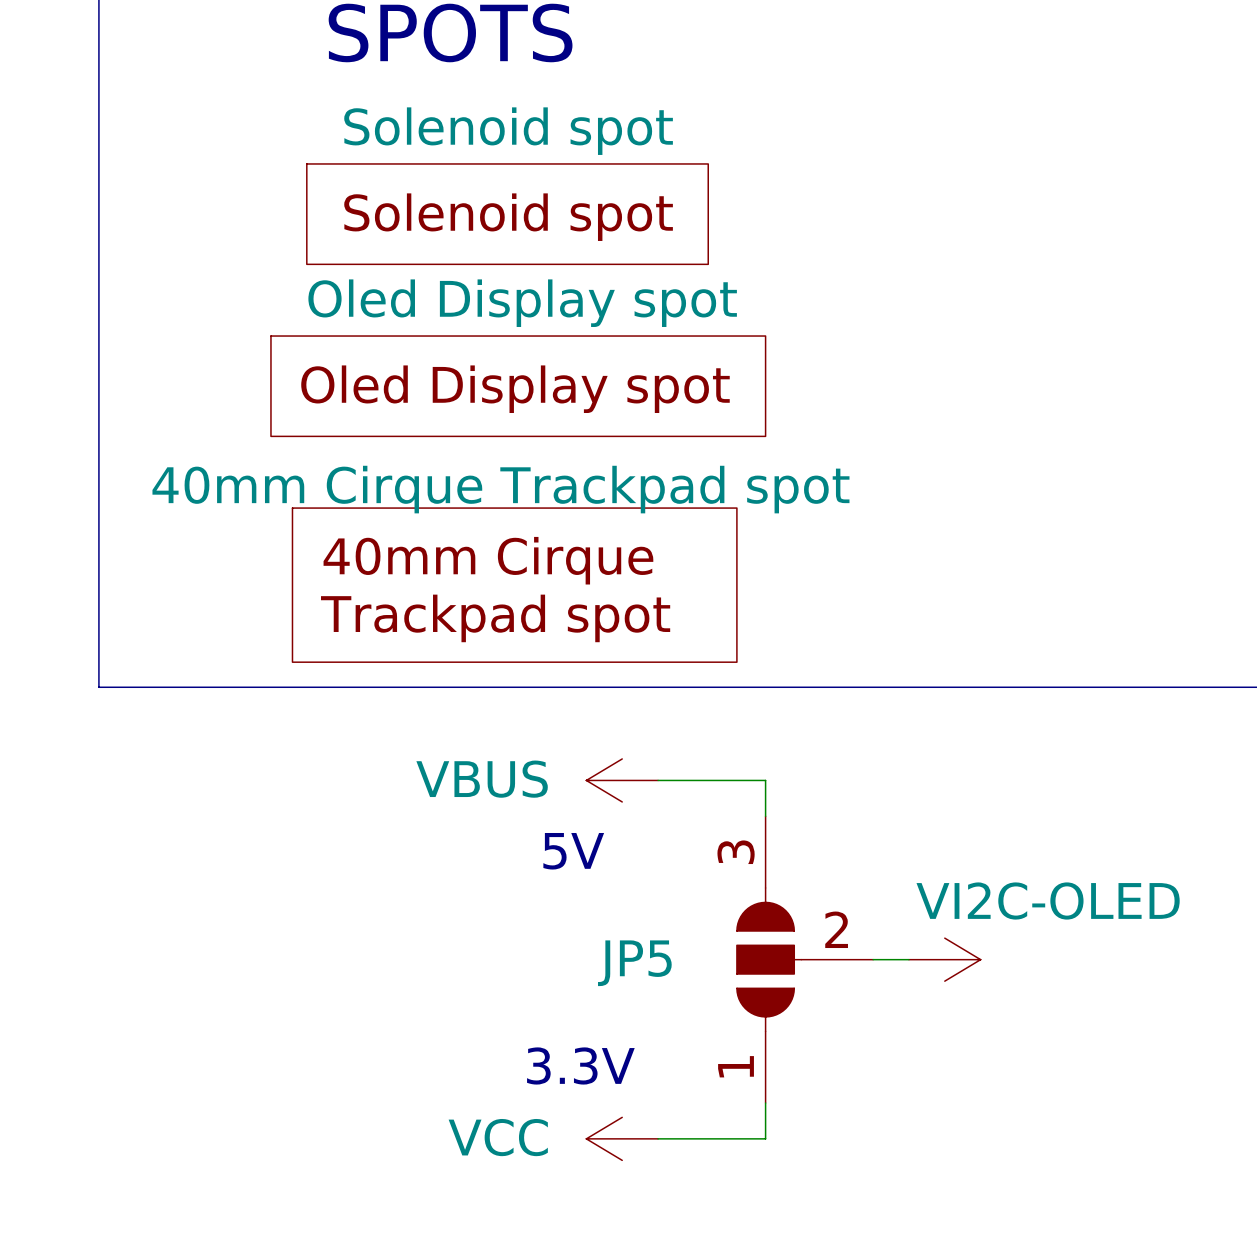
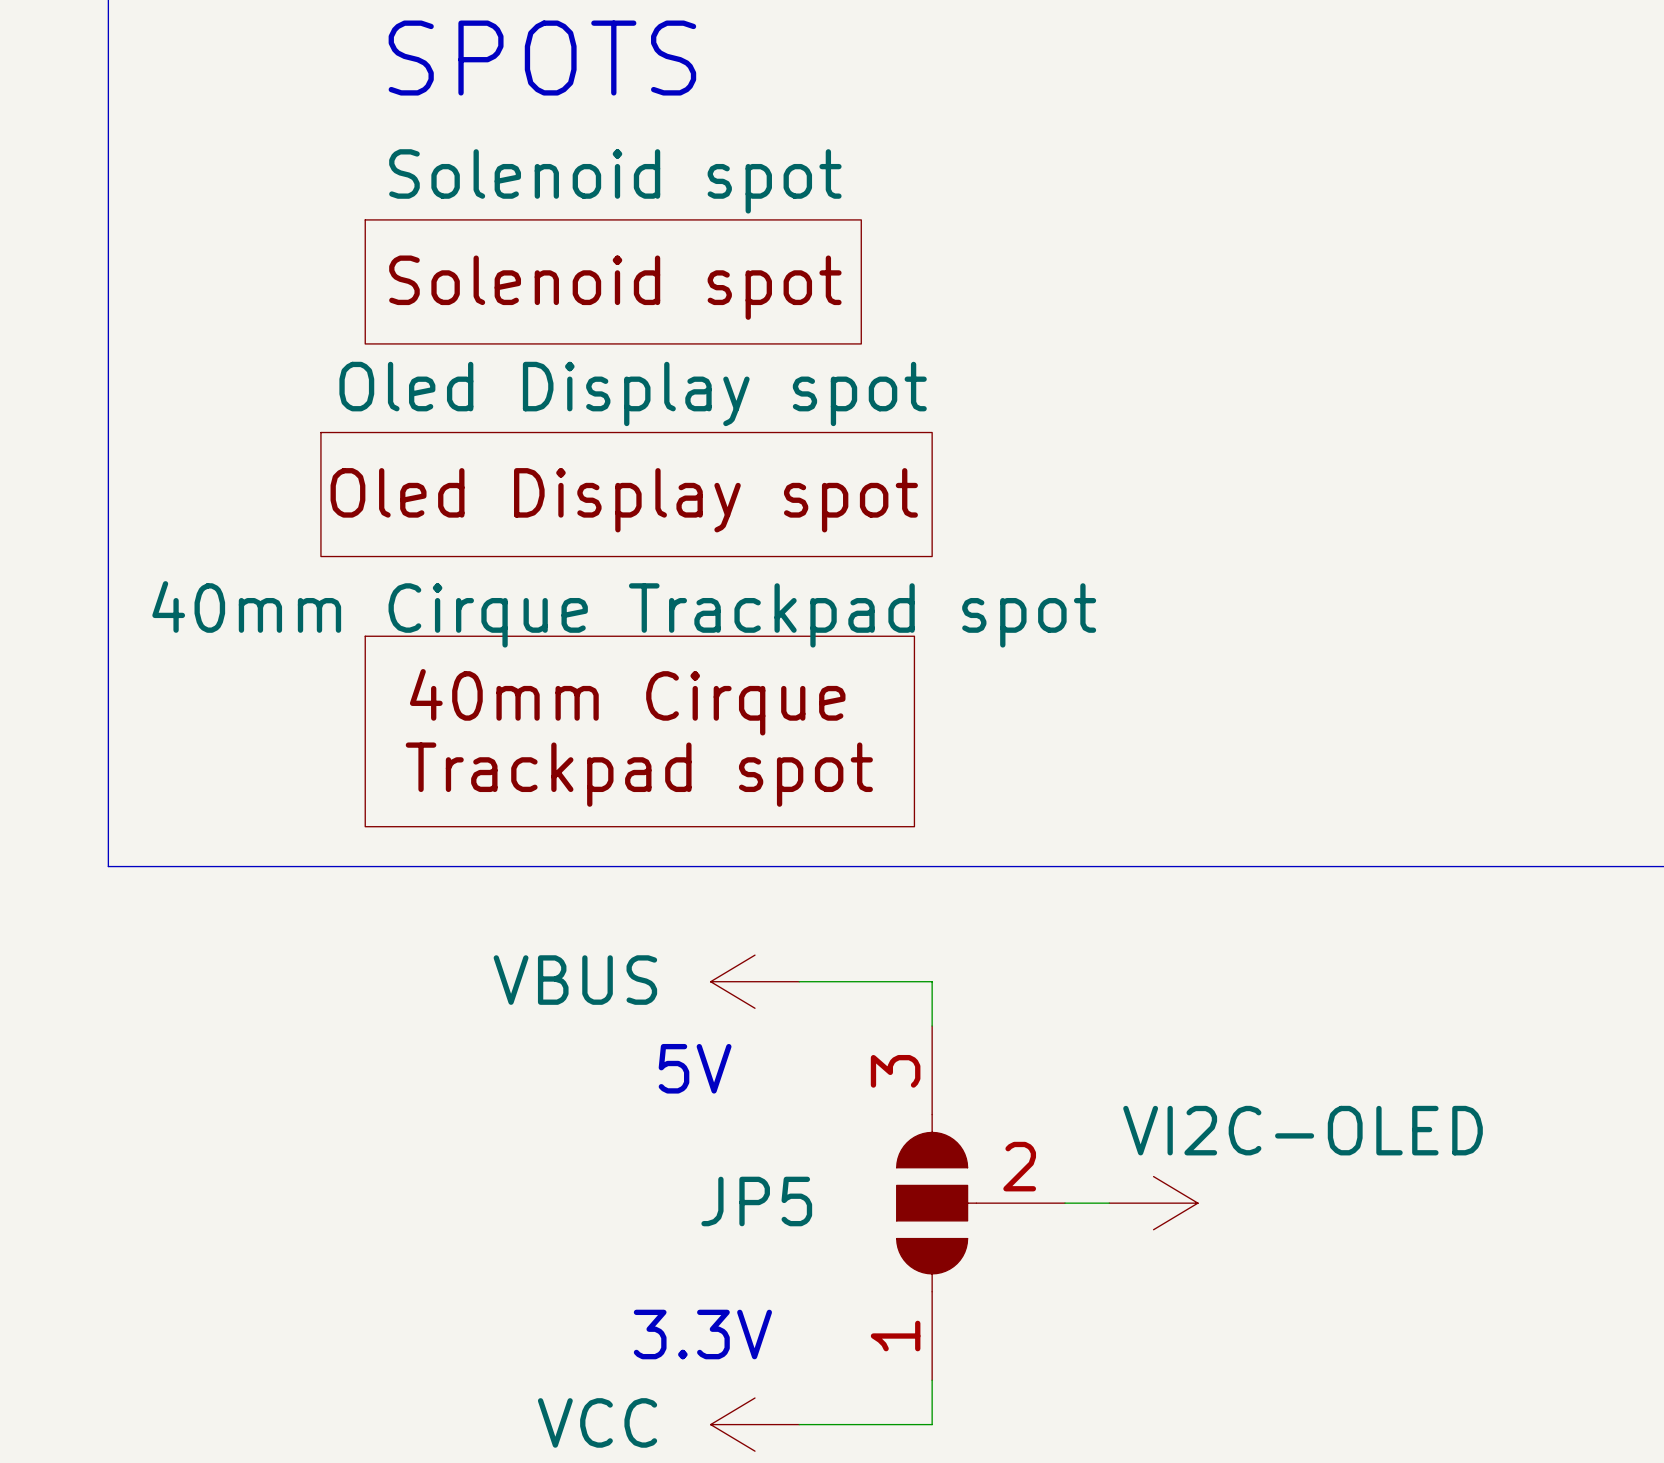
part position: (514, 585) -> (639, 731)

